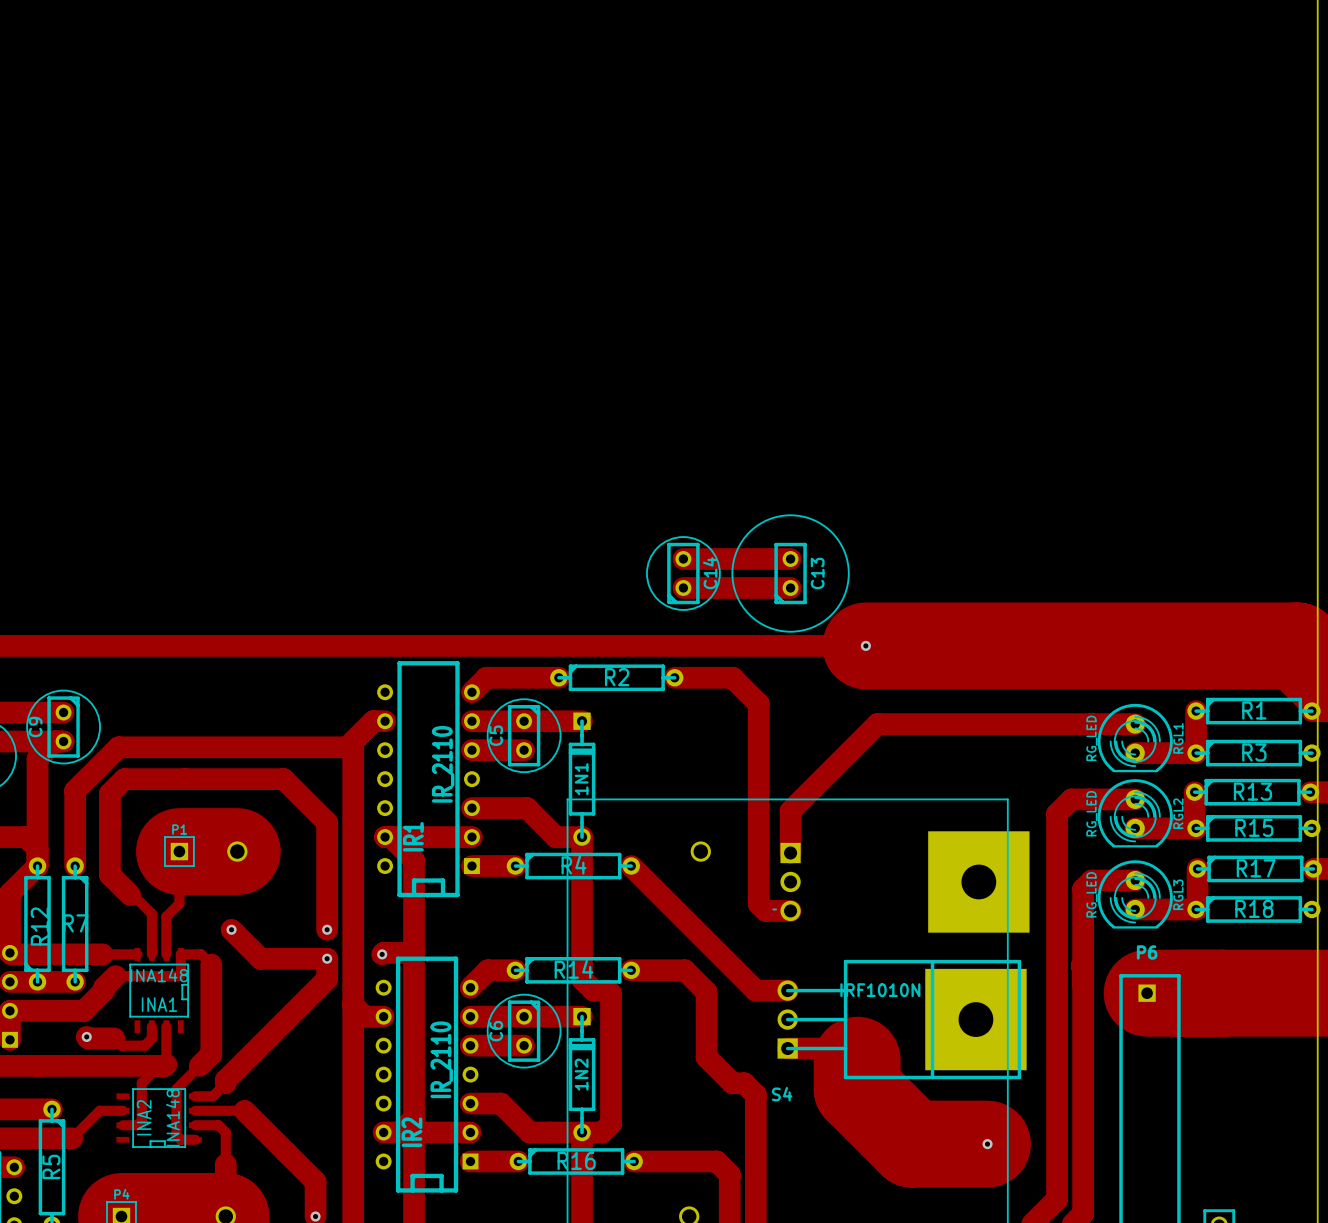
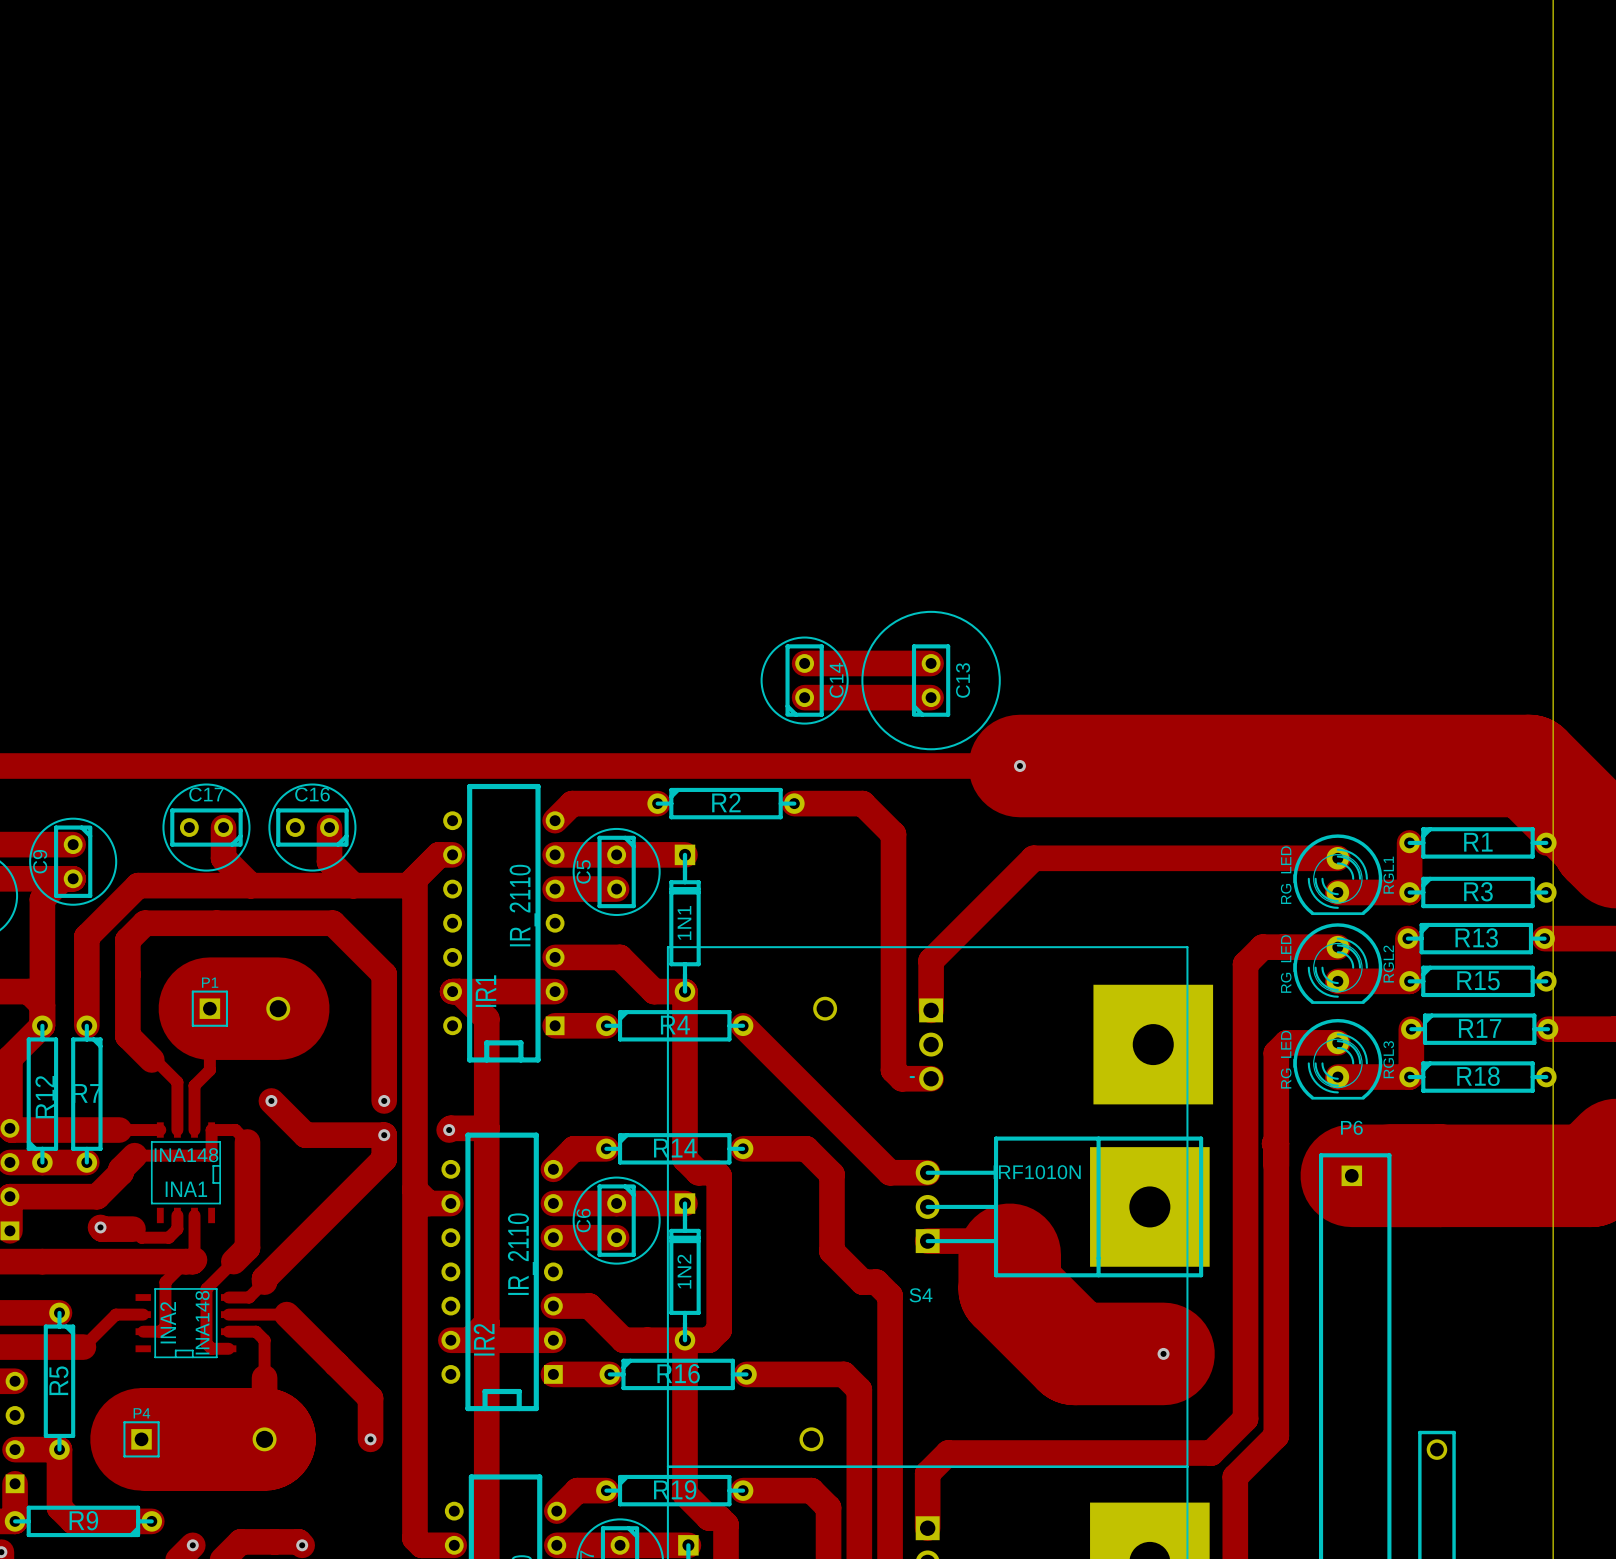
C17: none -> (206, 827)
track: none -> (223, 827) (223, 858) (250, 885)
C16: none -> (312, 827)
track: none -> (329, 827) (329, 861) (353, 885)

